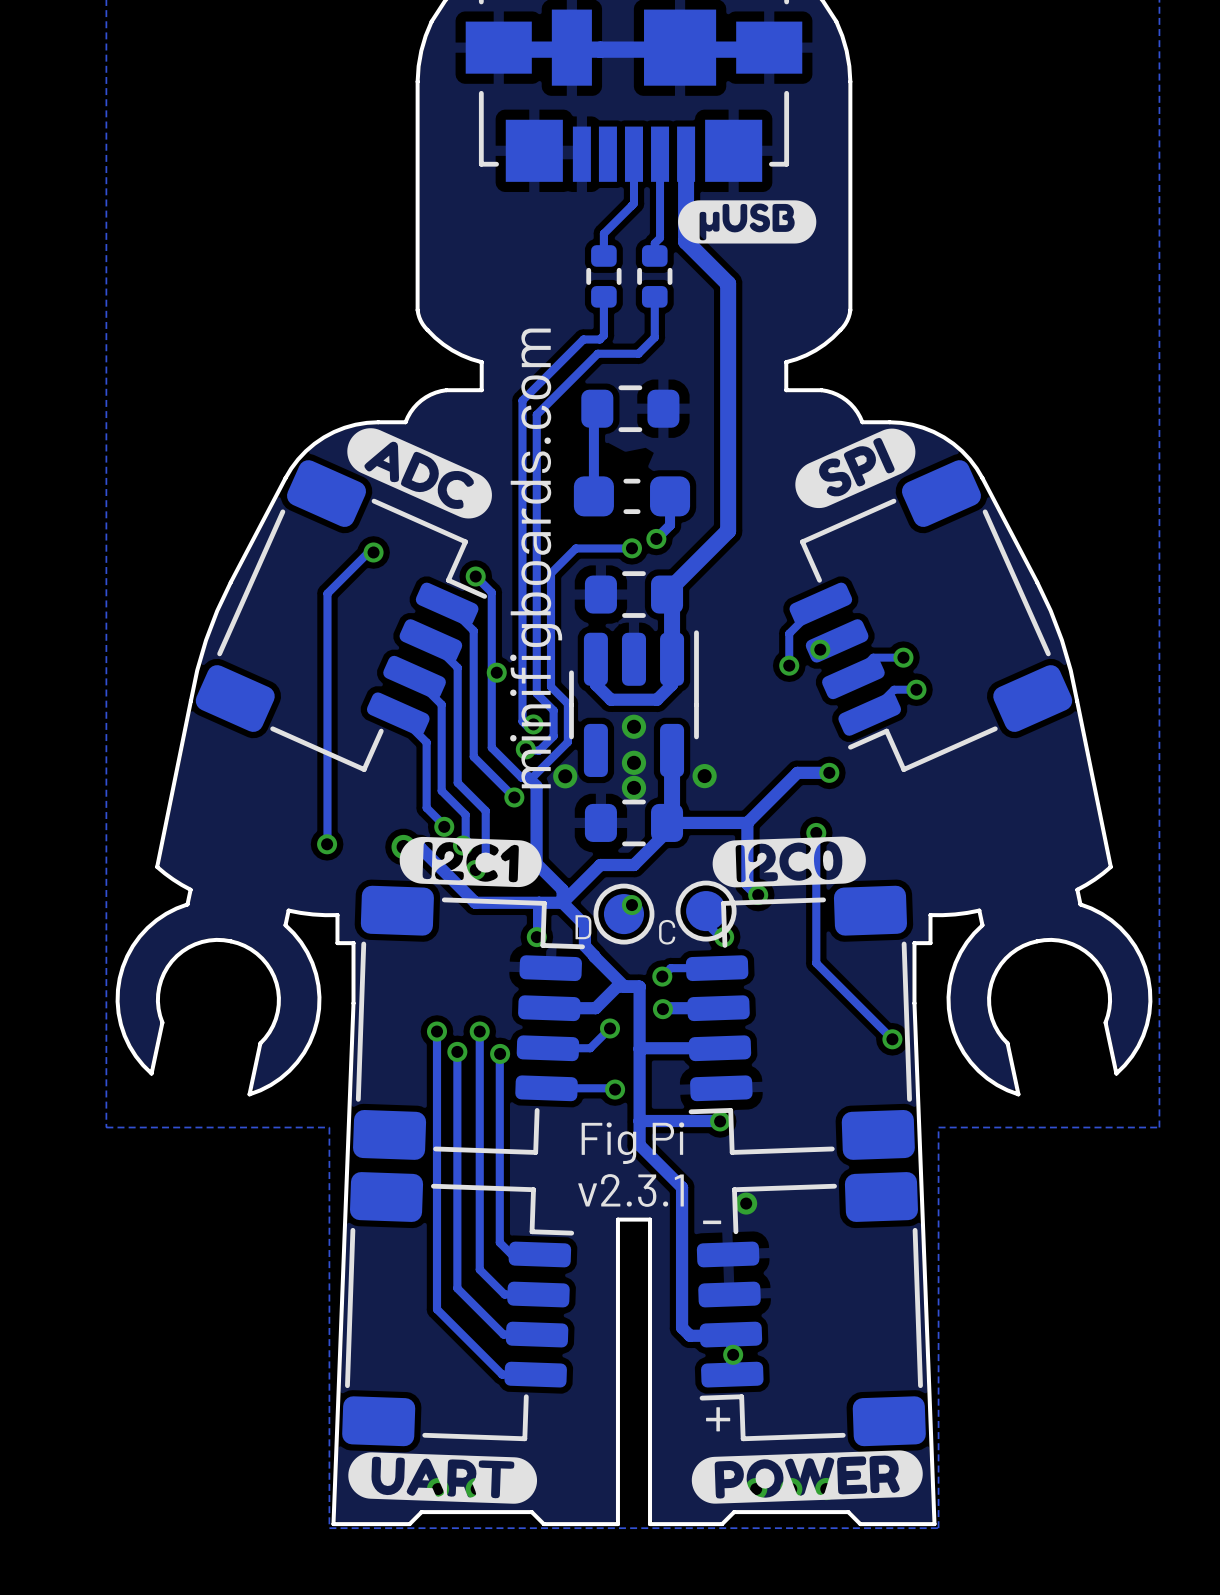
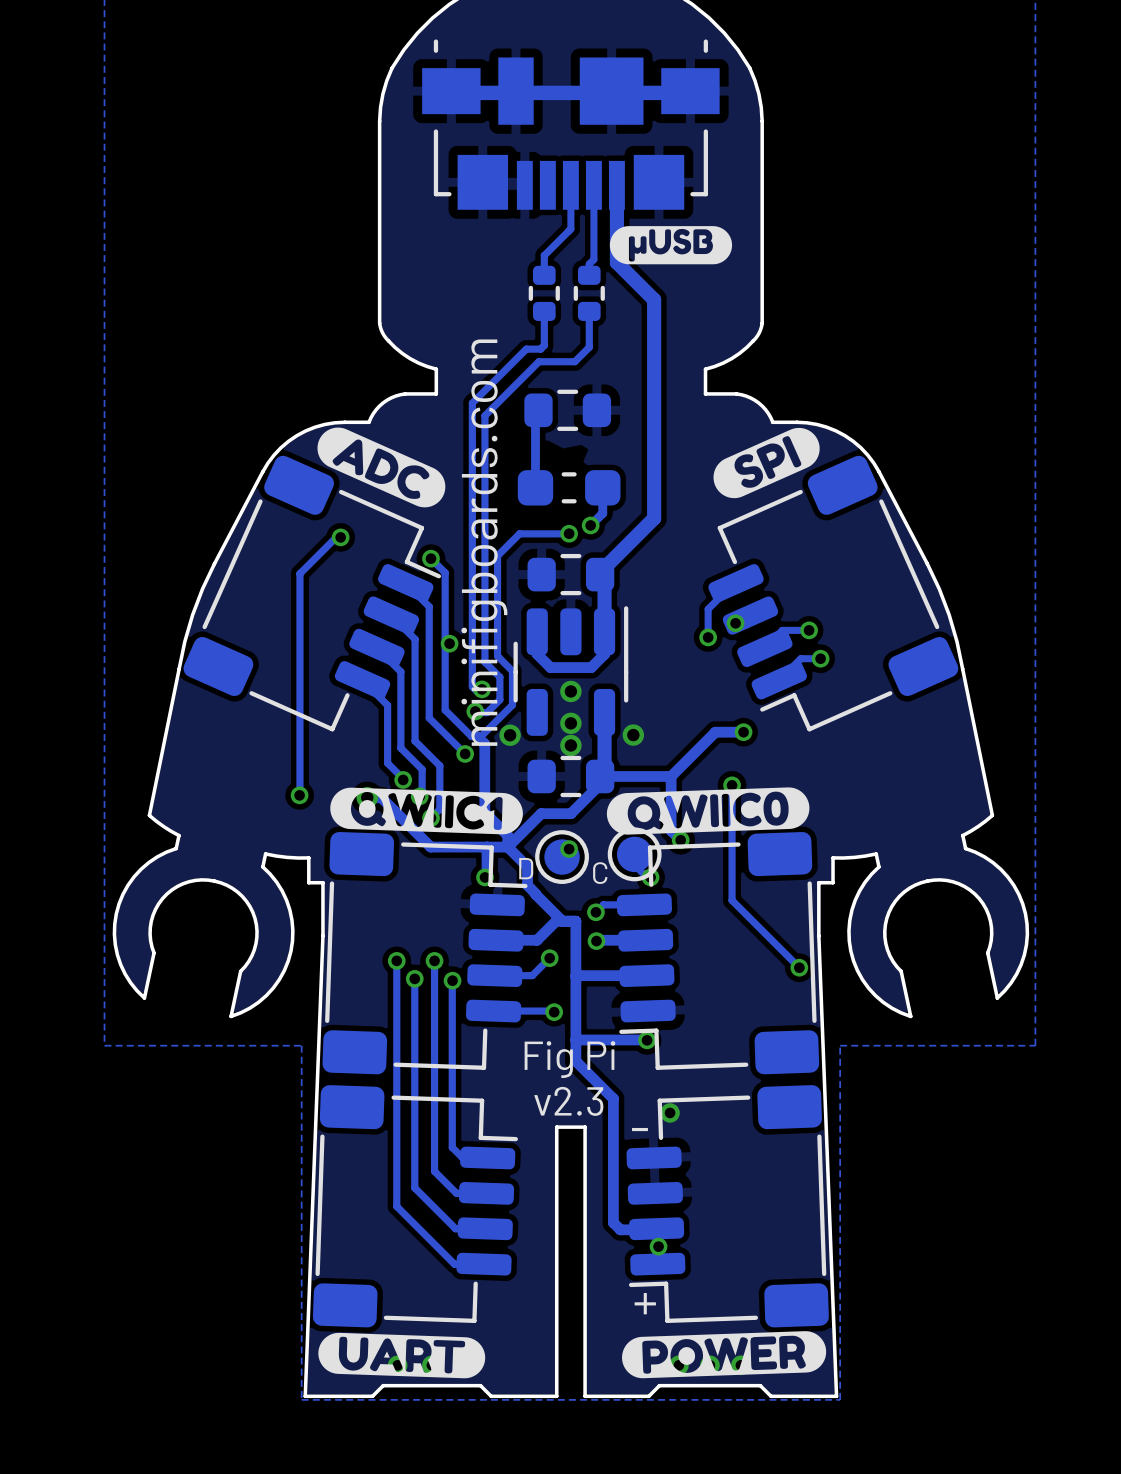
drawing shape: [399, 836, 542, 888] -> [330, 787, 523, 835]
drawing shape: [712, 836, 866, 888] -> [606, 787, 810, 835]
text: v2.3.1 (631, 1190) -> v2.3 (568, 1101)

